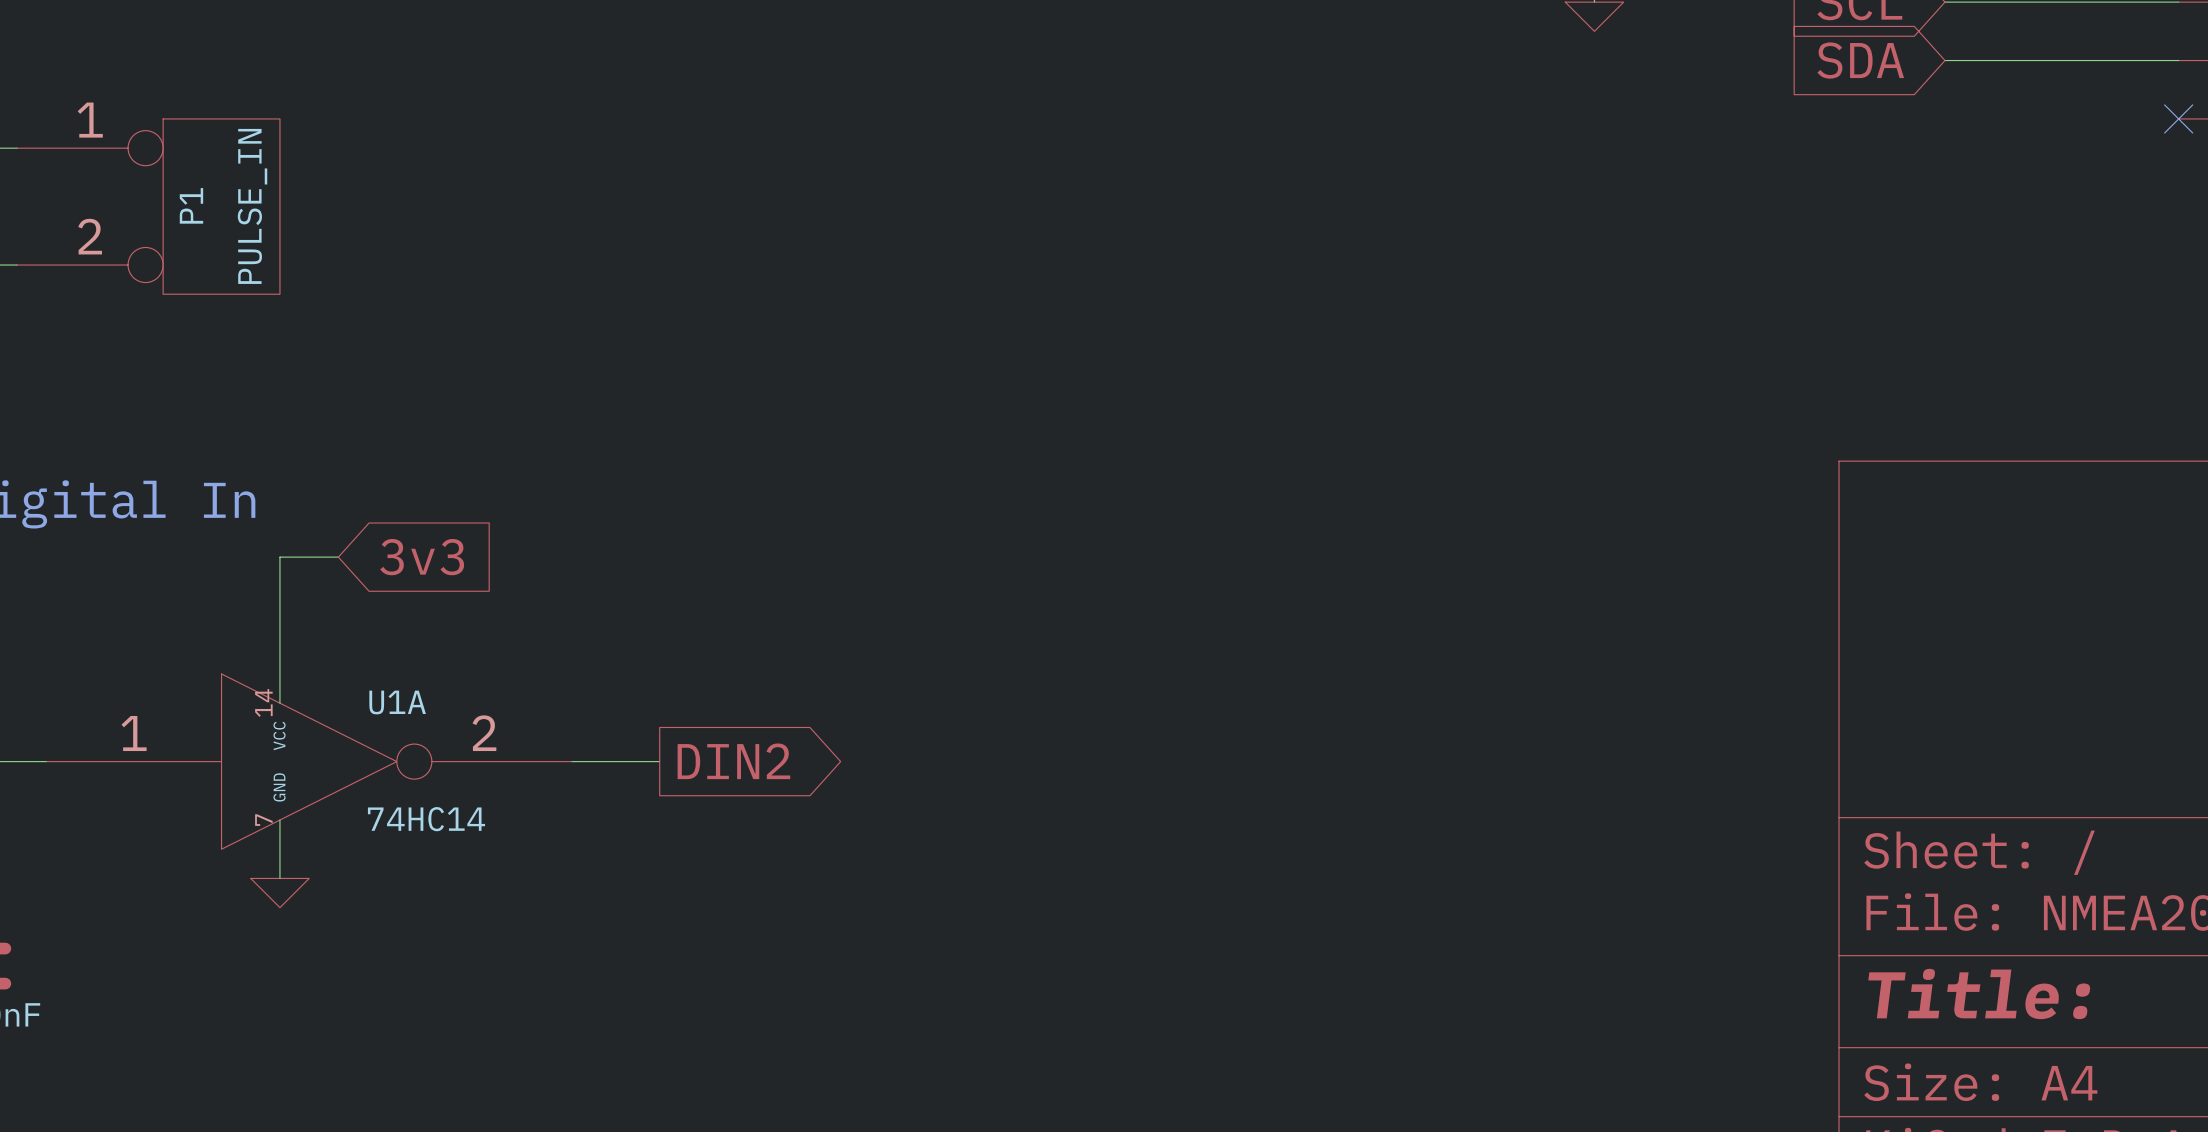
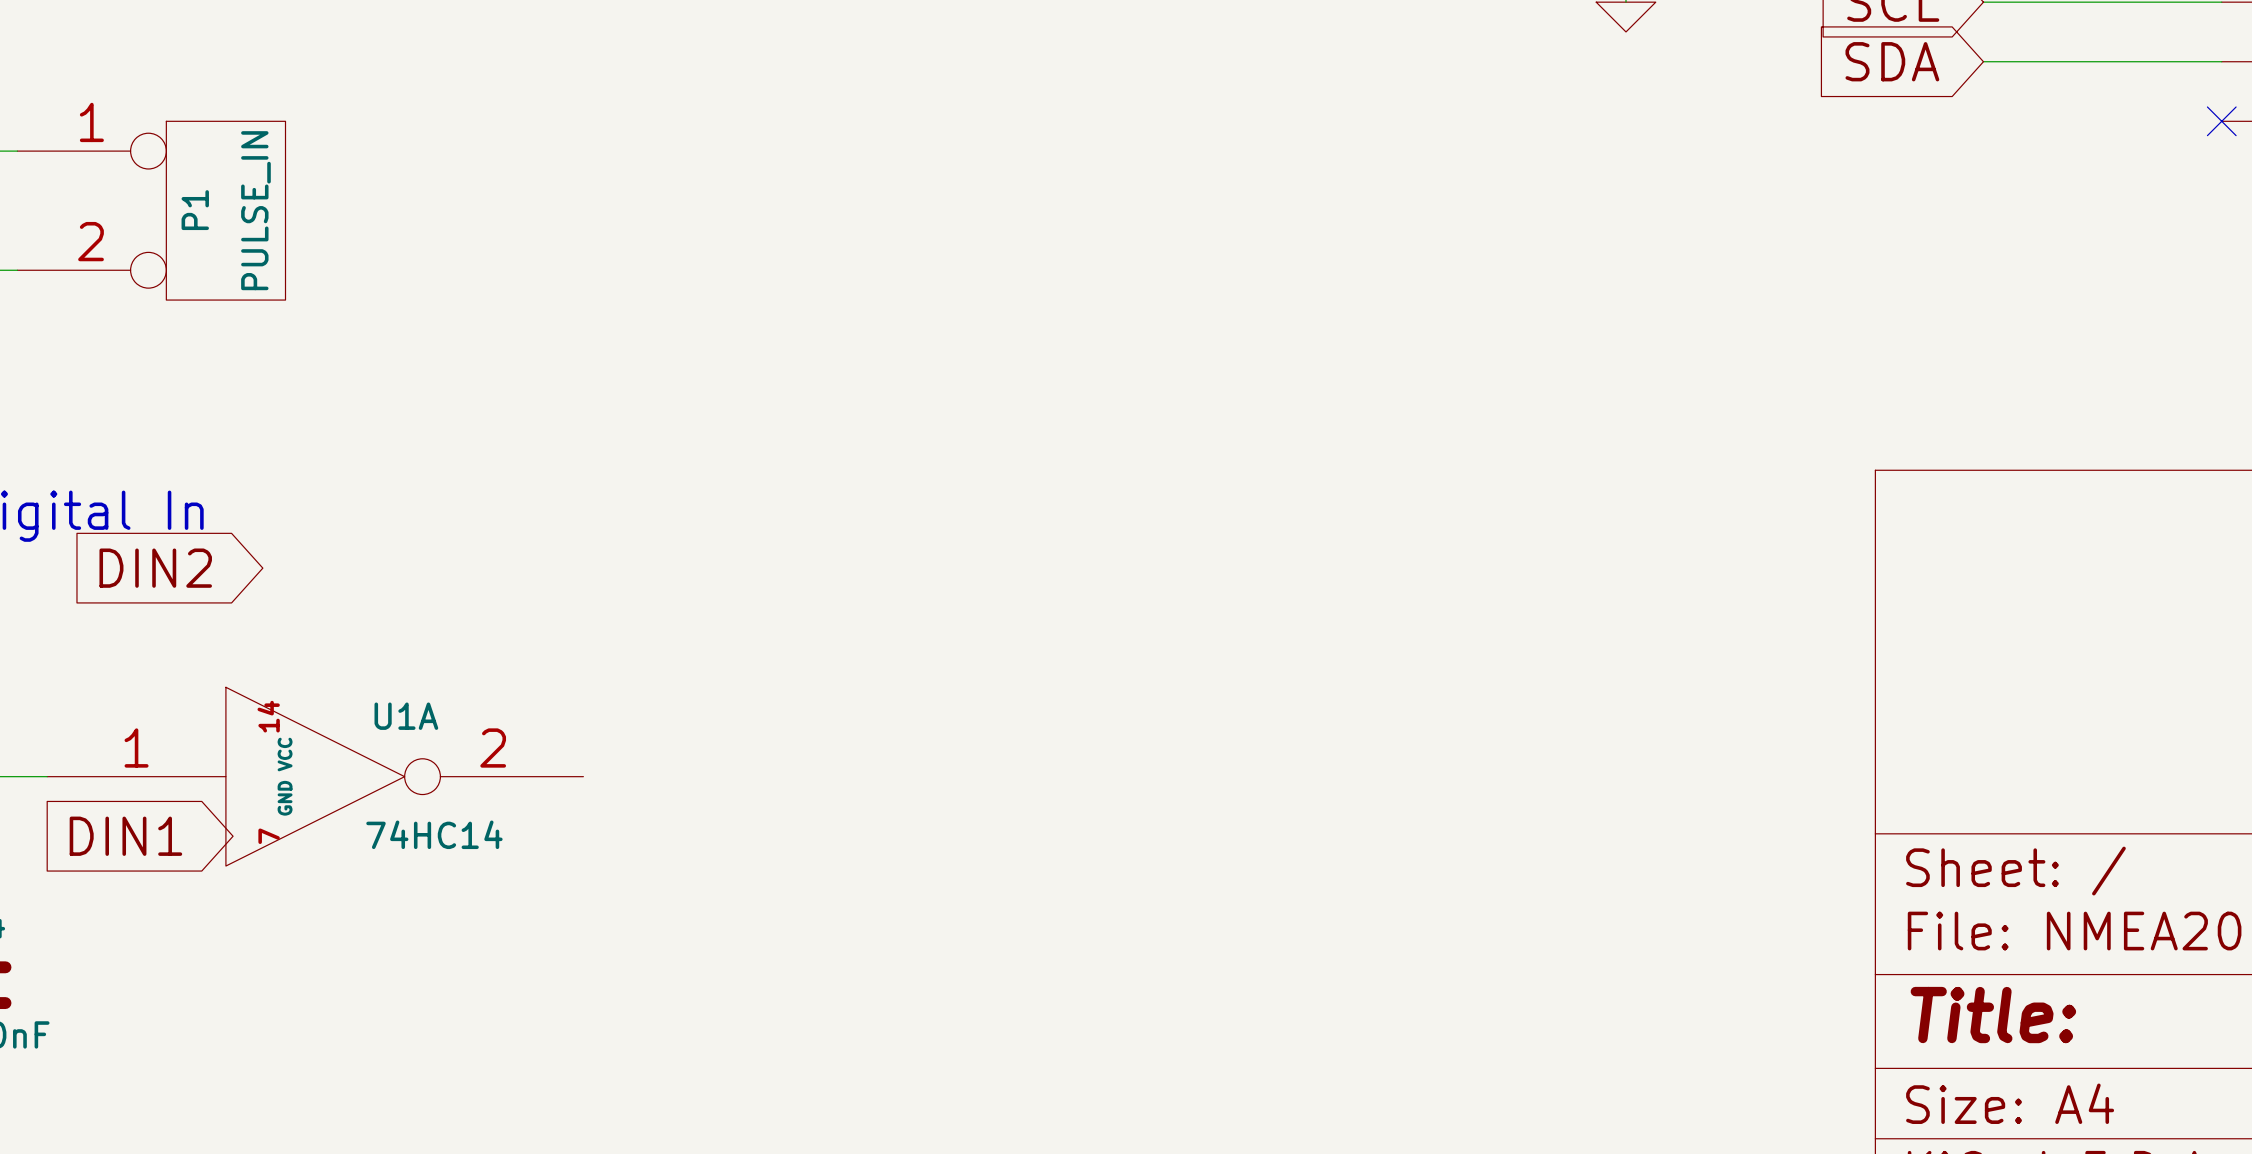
global label: none -> DIN2 (155, 568)
wire: (338, 557) (279, 557) (279, 703) -> none
global label: 3v3 (422, 557) -> none
wire: (572, 761) (659, 761) -> none
global label: DIN2 (733, 761) -> none
global label: none -> DIN1 (125, 836)
wire: (279, 820) (279, 878) -> none
power symbol: (279, 893) -> none

